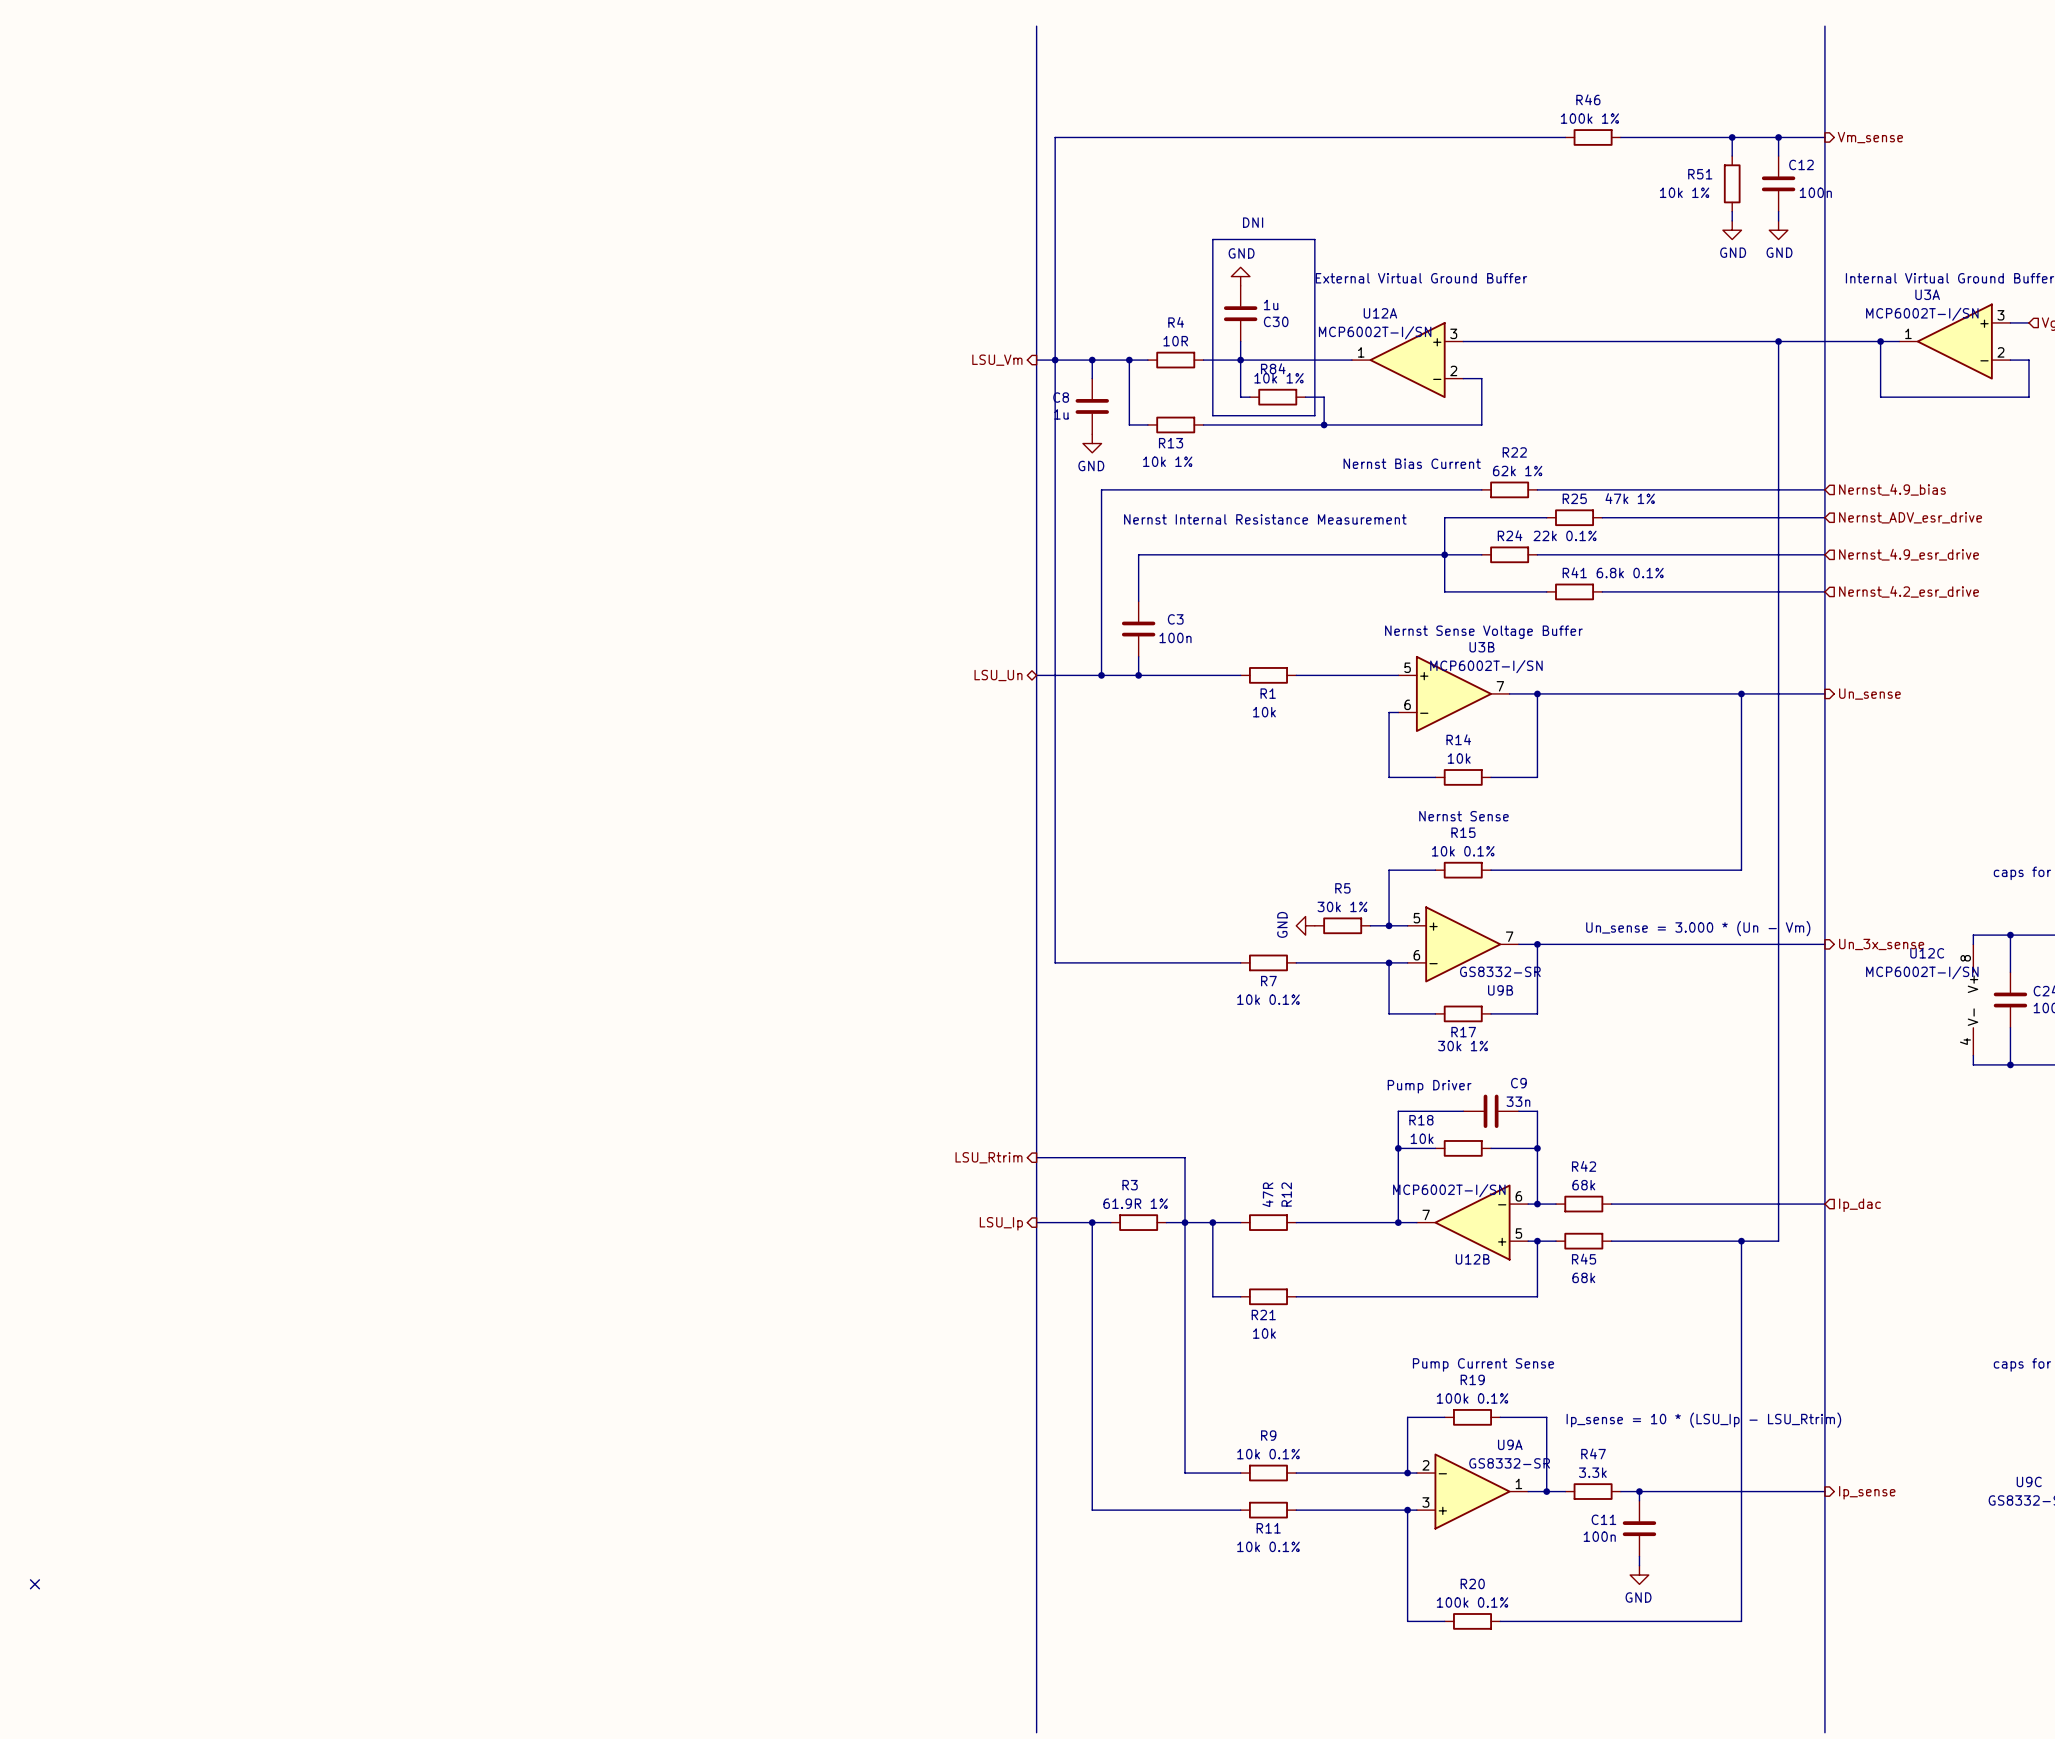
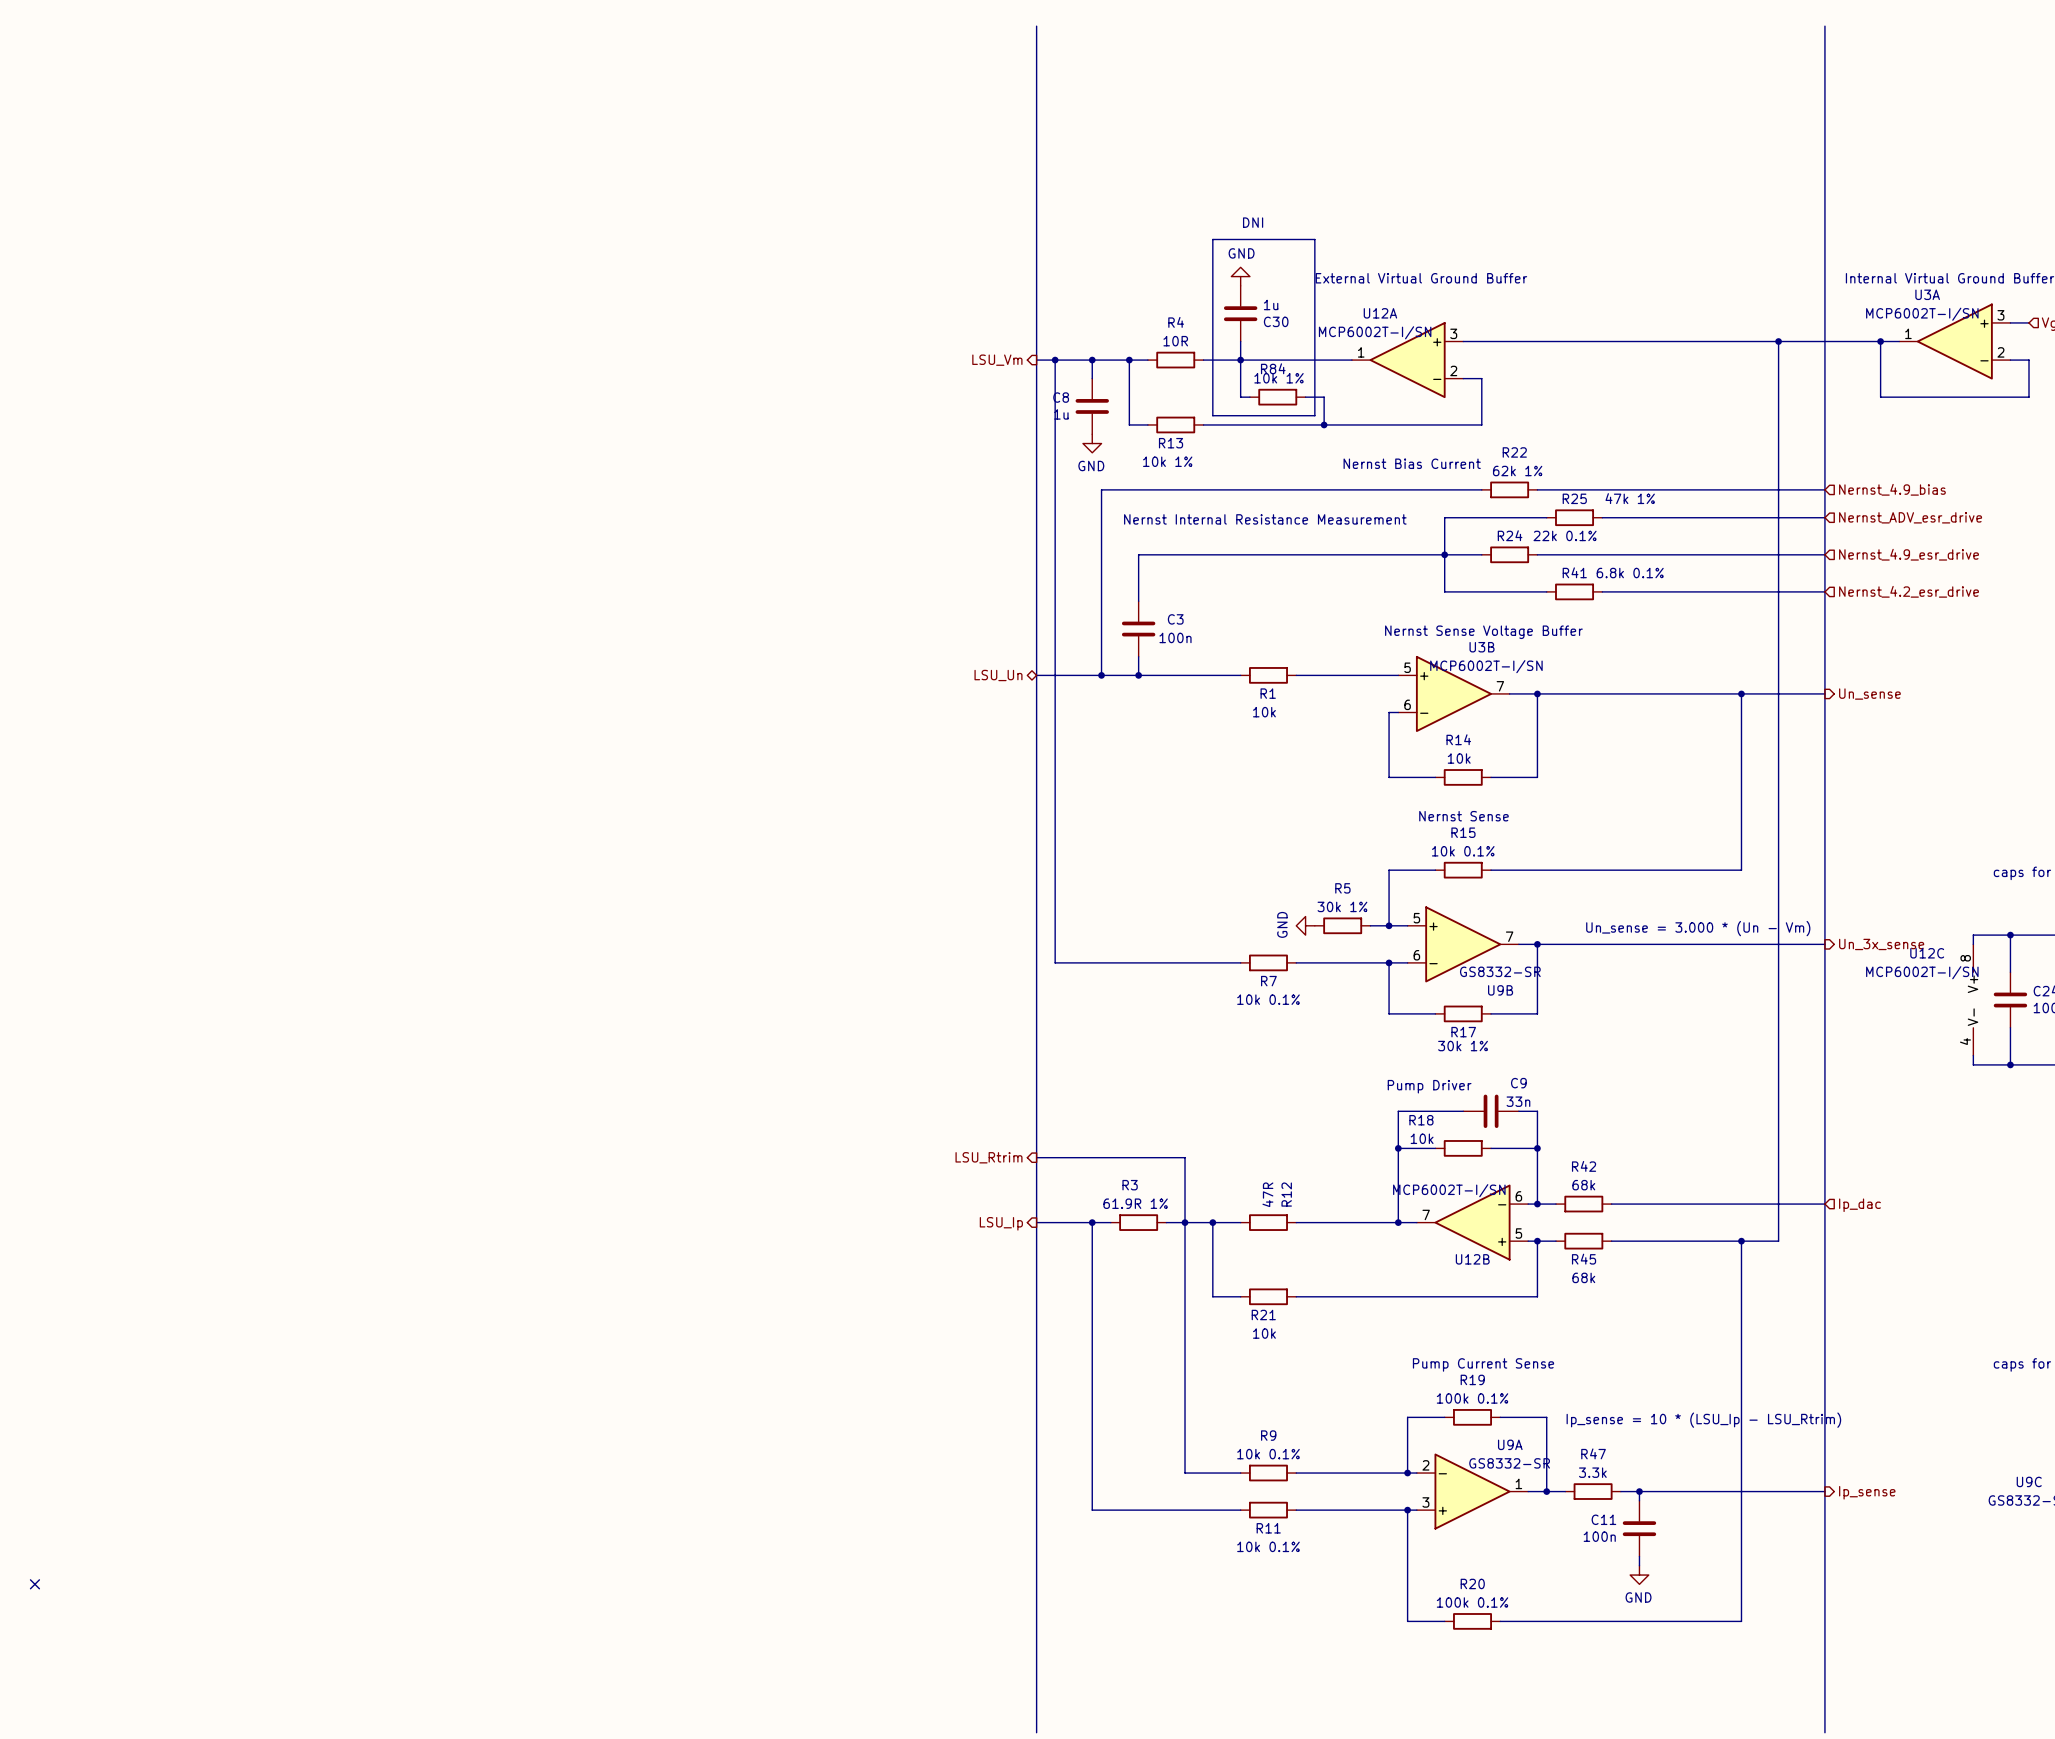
wire: (1565, 137) (1055, 137) (1055, 360) -> none
R46: 100k 1% (1593, 137) -> none
wire: (1620, 137) (1824, 137) -> none
wire: (1732, 137) (1732, 156) -> none
junction: (1732, 137) -> none
wire: (1778, 137) (1778, 156) -> none
junction: (1778, 137) -> none
hierarchical label: Vm_sense (1870, 137) -> none
R51: 10k 1% (1732, 183) -> none
C12: 100n (1778, 183) -> none
wire: (1732, 211) (1732, 220) -> none
wire: (1778, 211) (1778, 220) -> none
power symbol: GND (1732, 230) -> none
power symbol: GND (1778, 230) -> none

